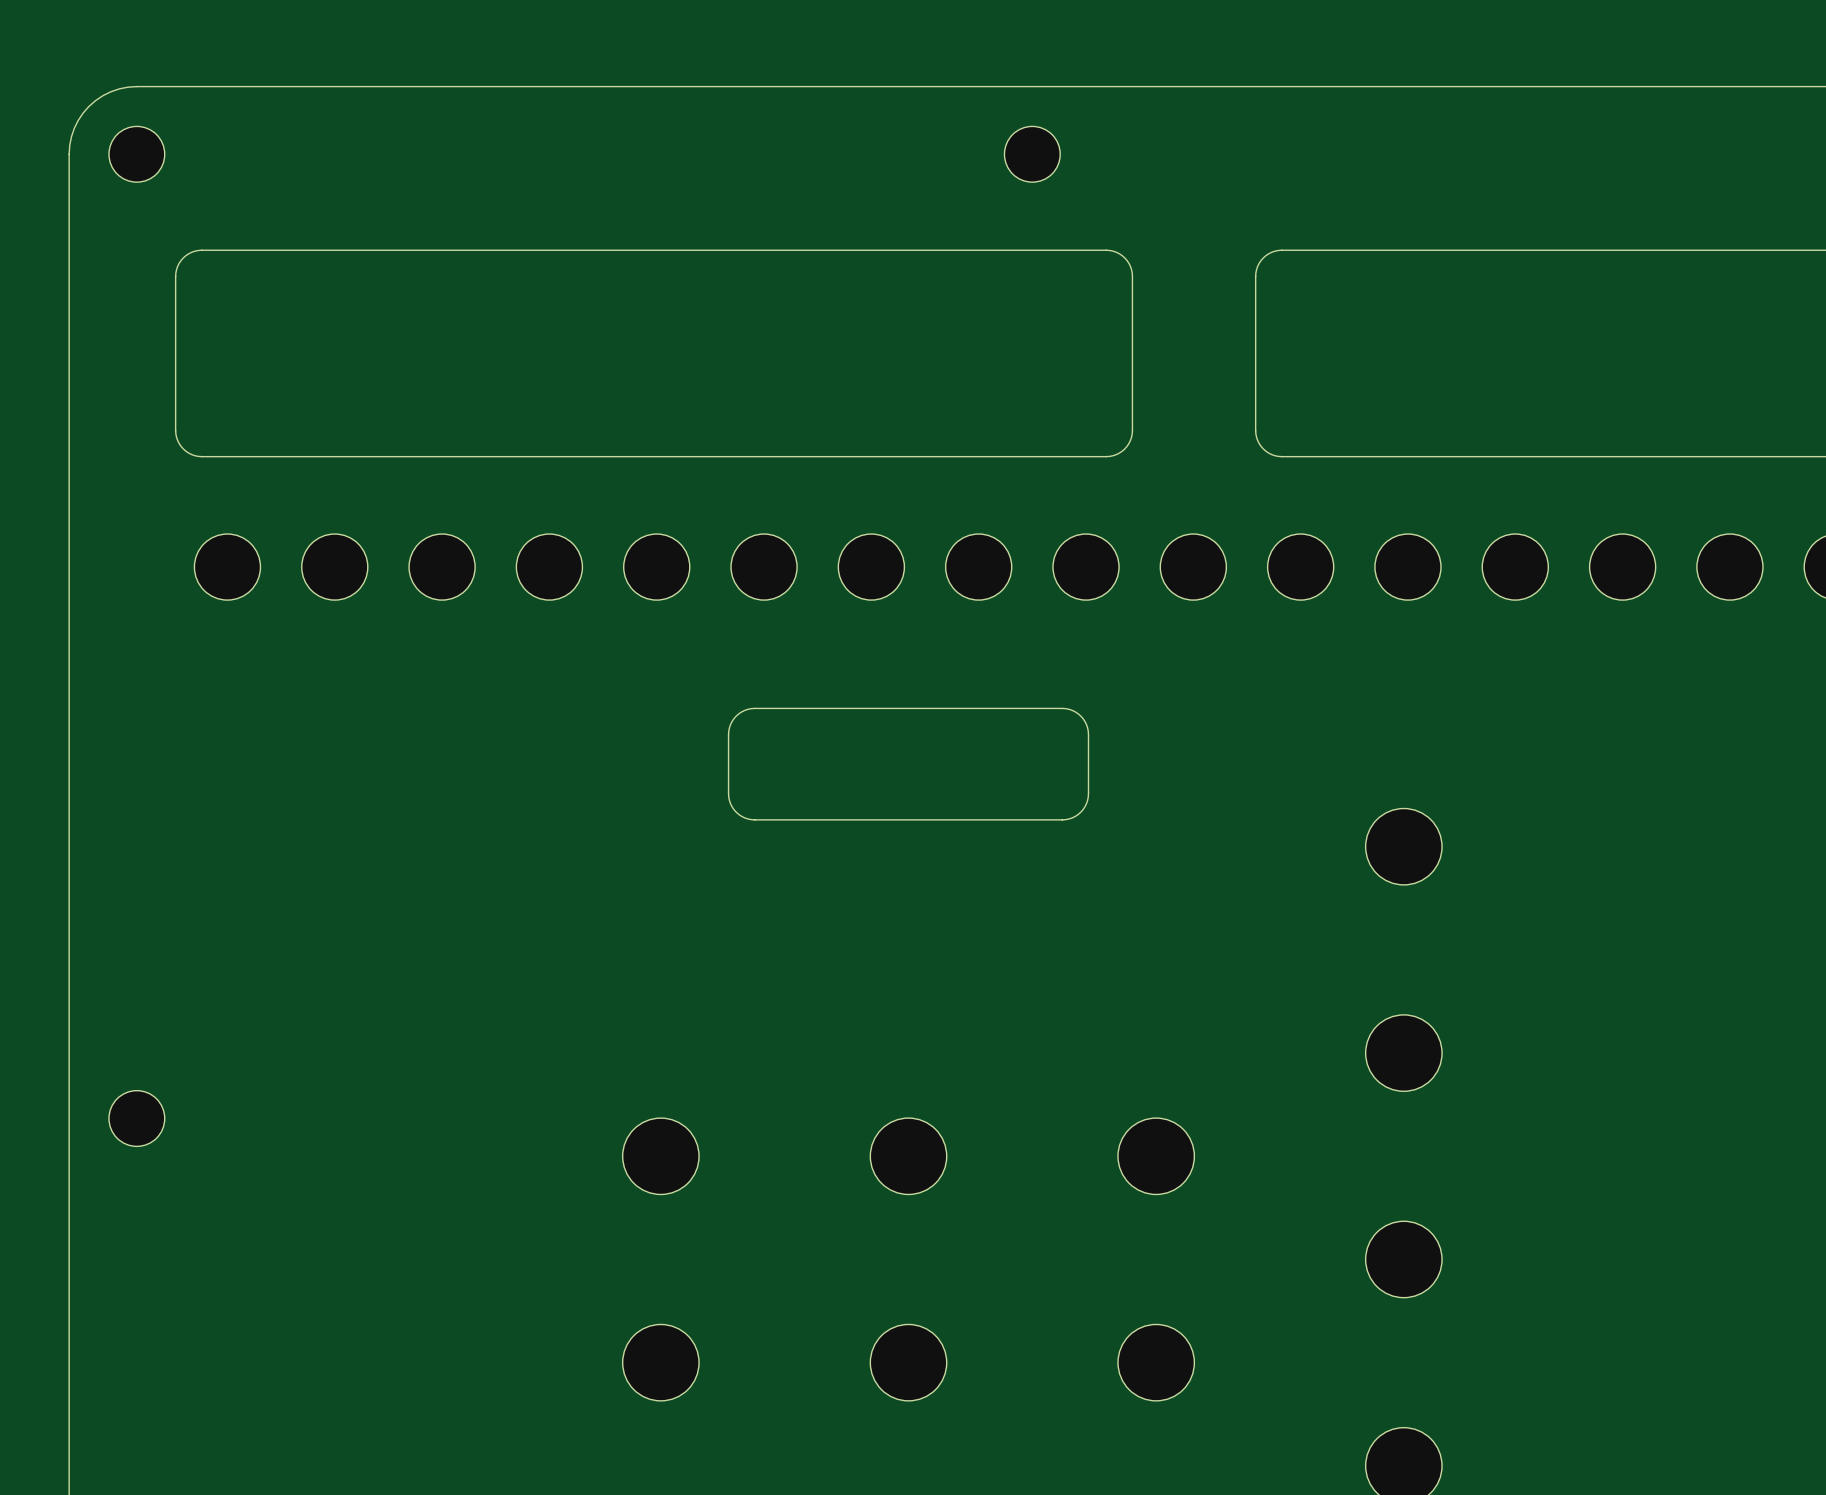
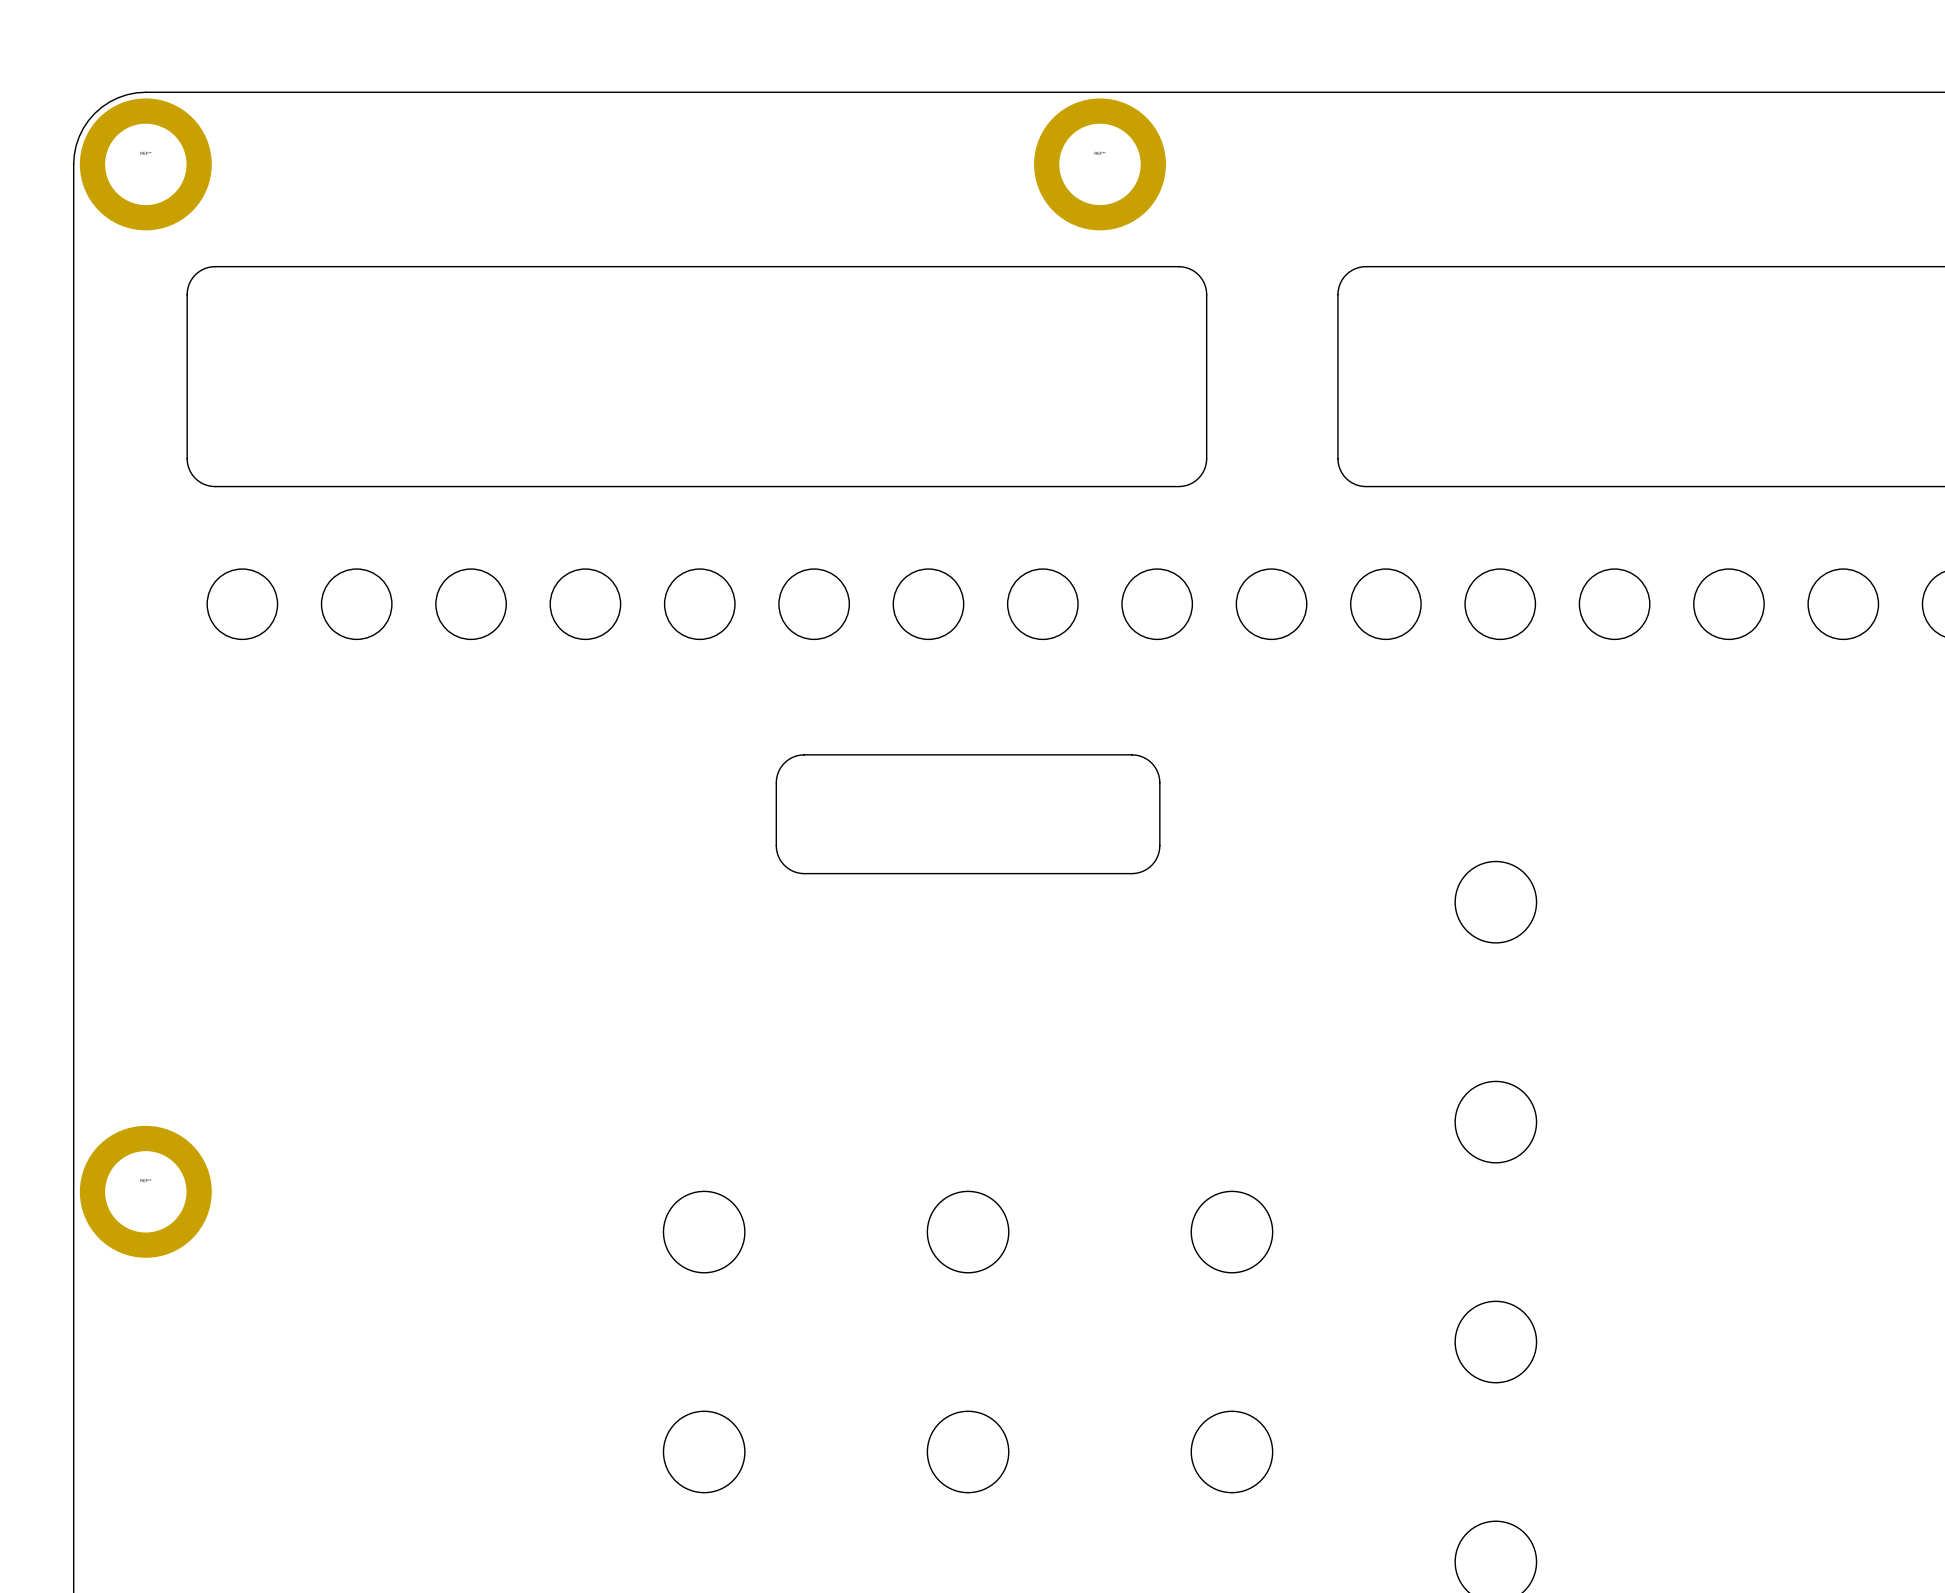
part: (136, 154) -> none
part: none -> (145, 164)
part: (1032, 154) -> none
part: none -> (1100, 164)
part: (136, 1118) -> none
part: none -> (145, 1191)

